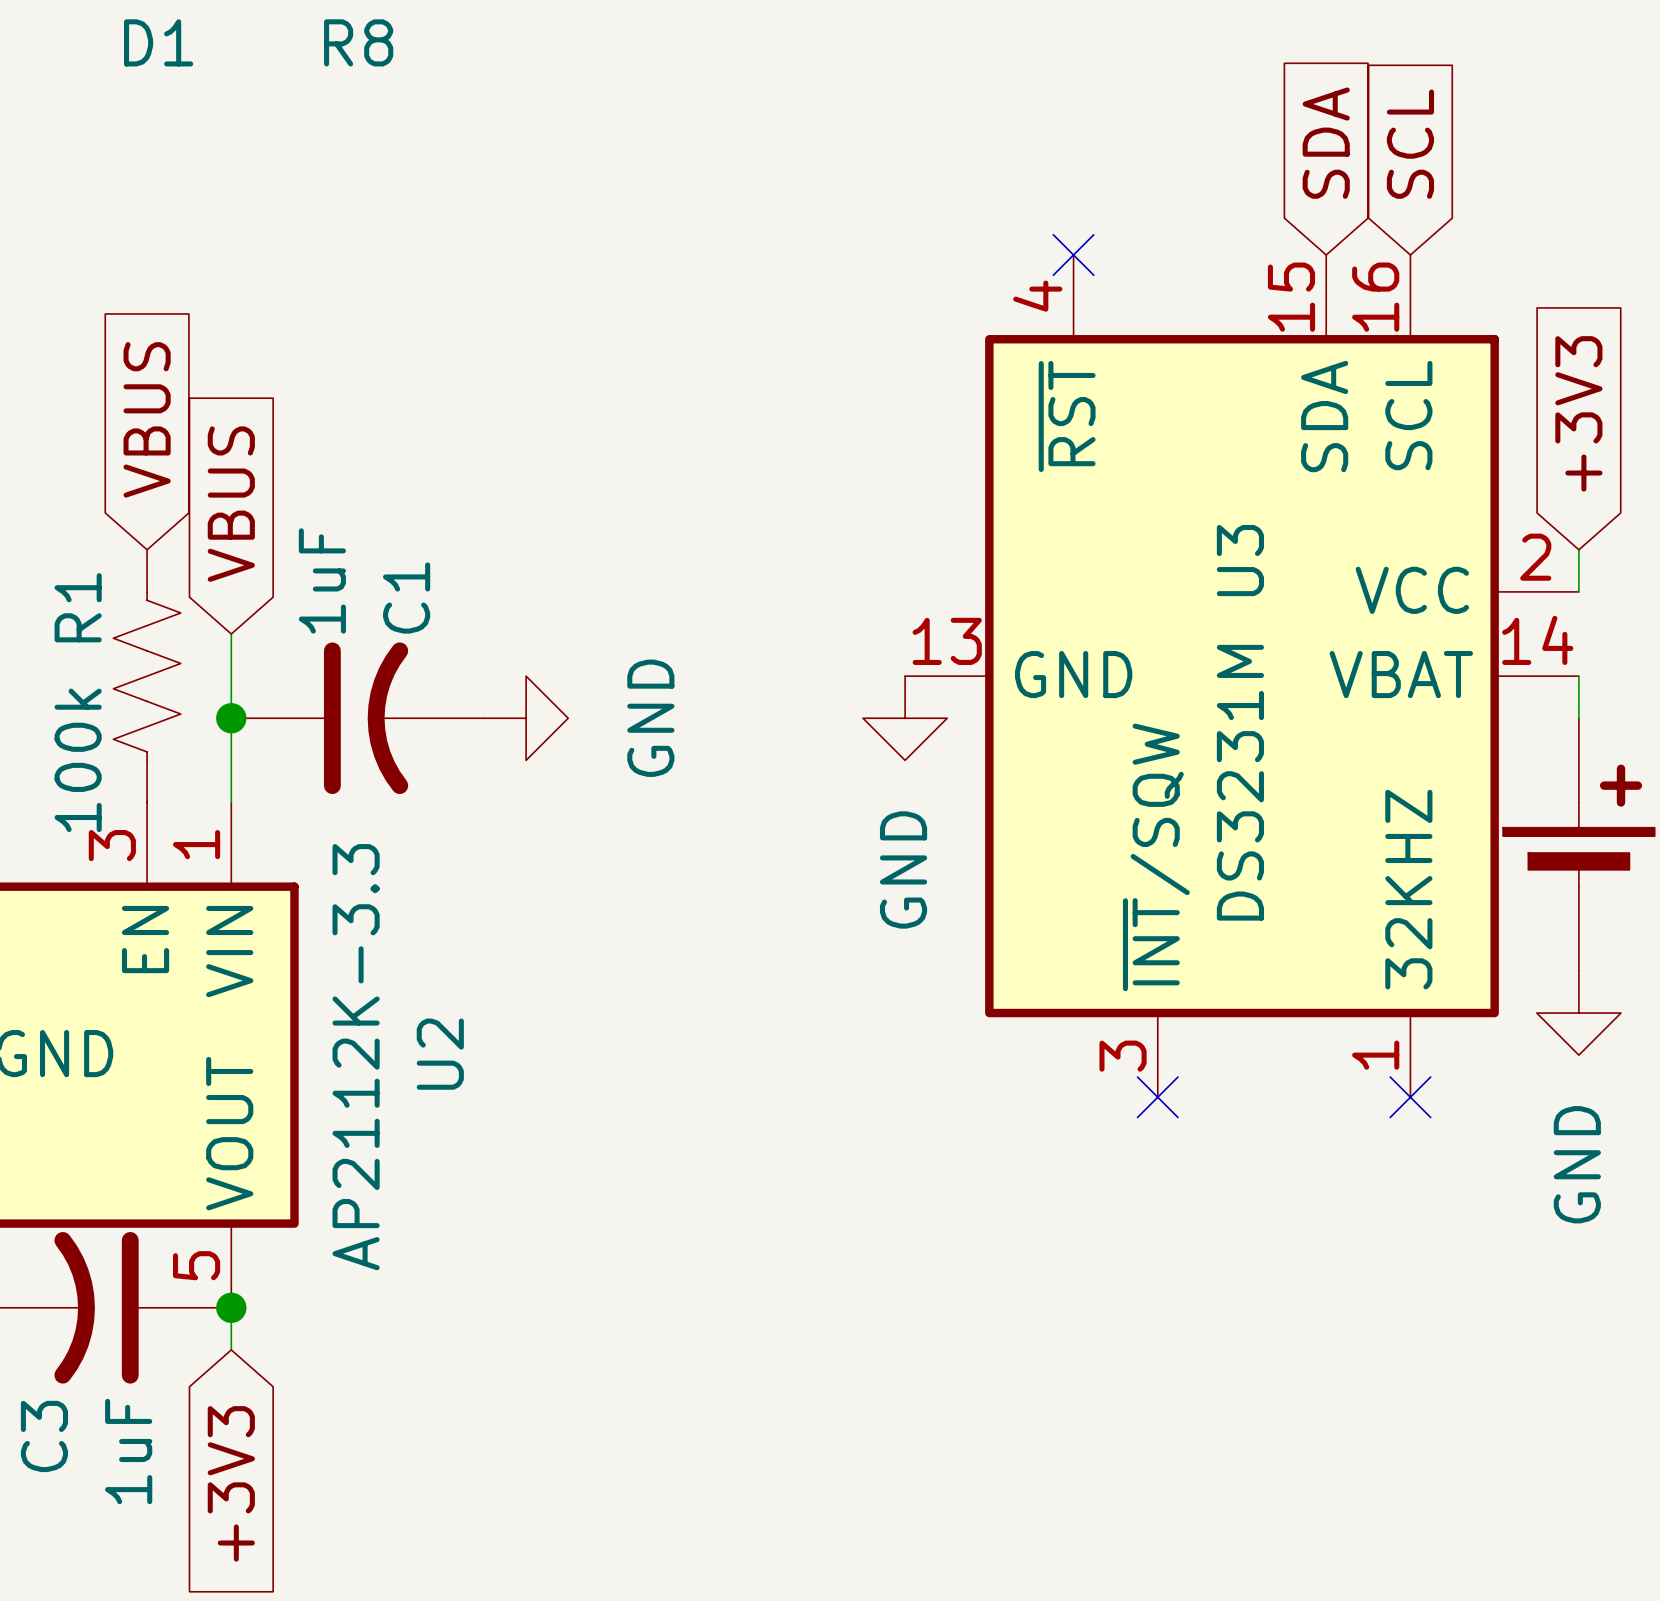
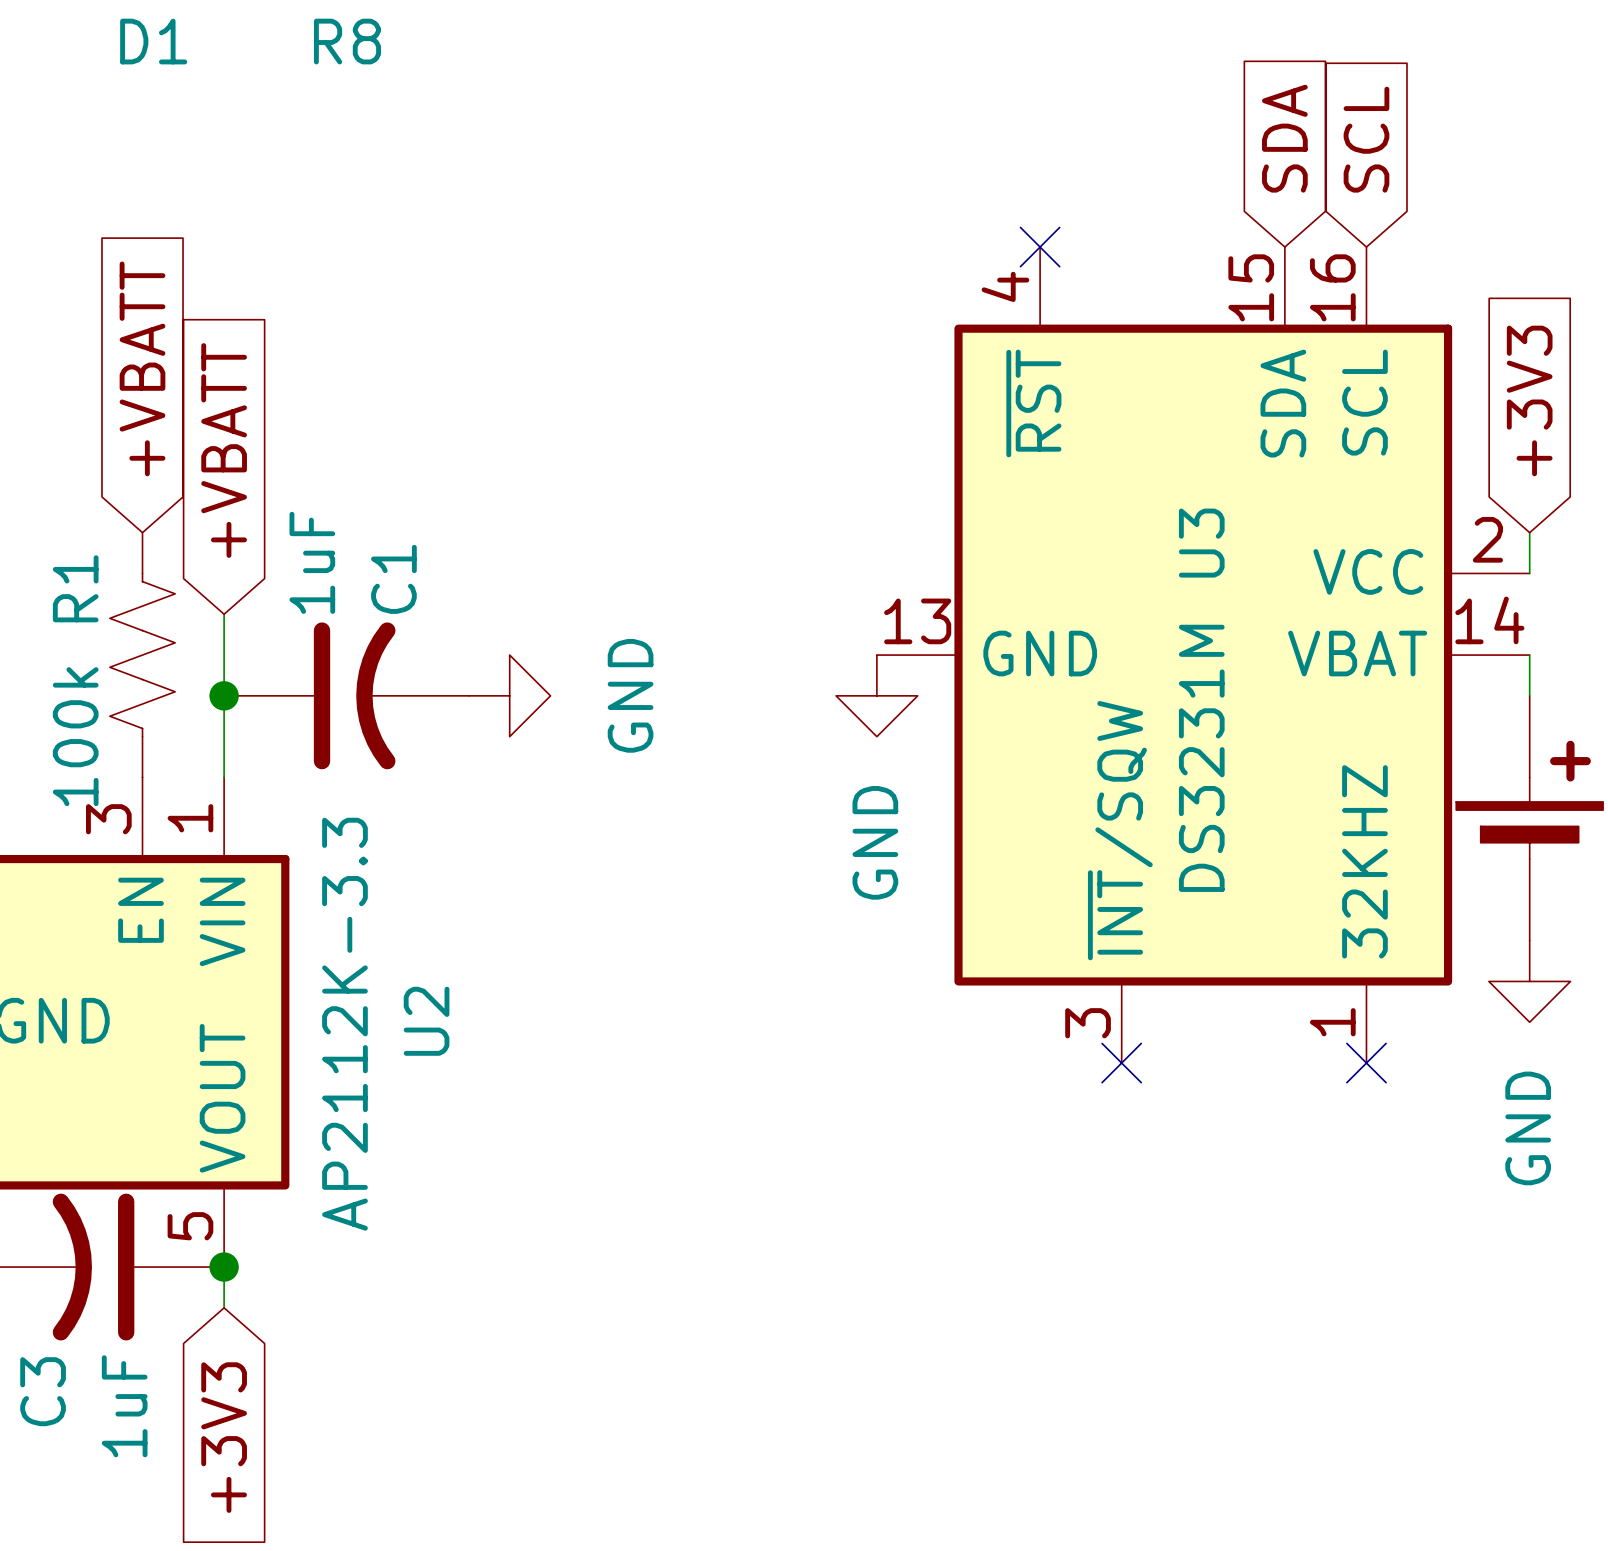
global label: VBUS (147, 419) -> +VBATT (142, 368)
global label: VBUS (231, 504) -> +VBATT (224, 450)

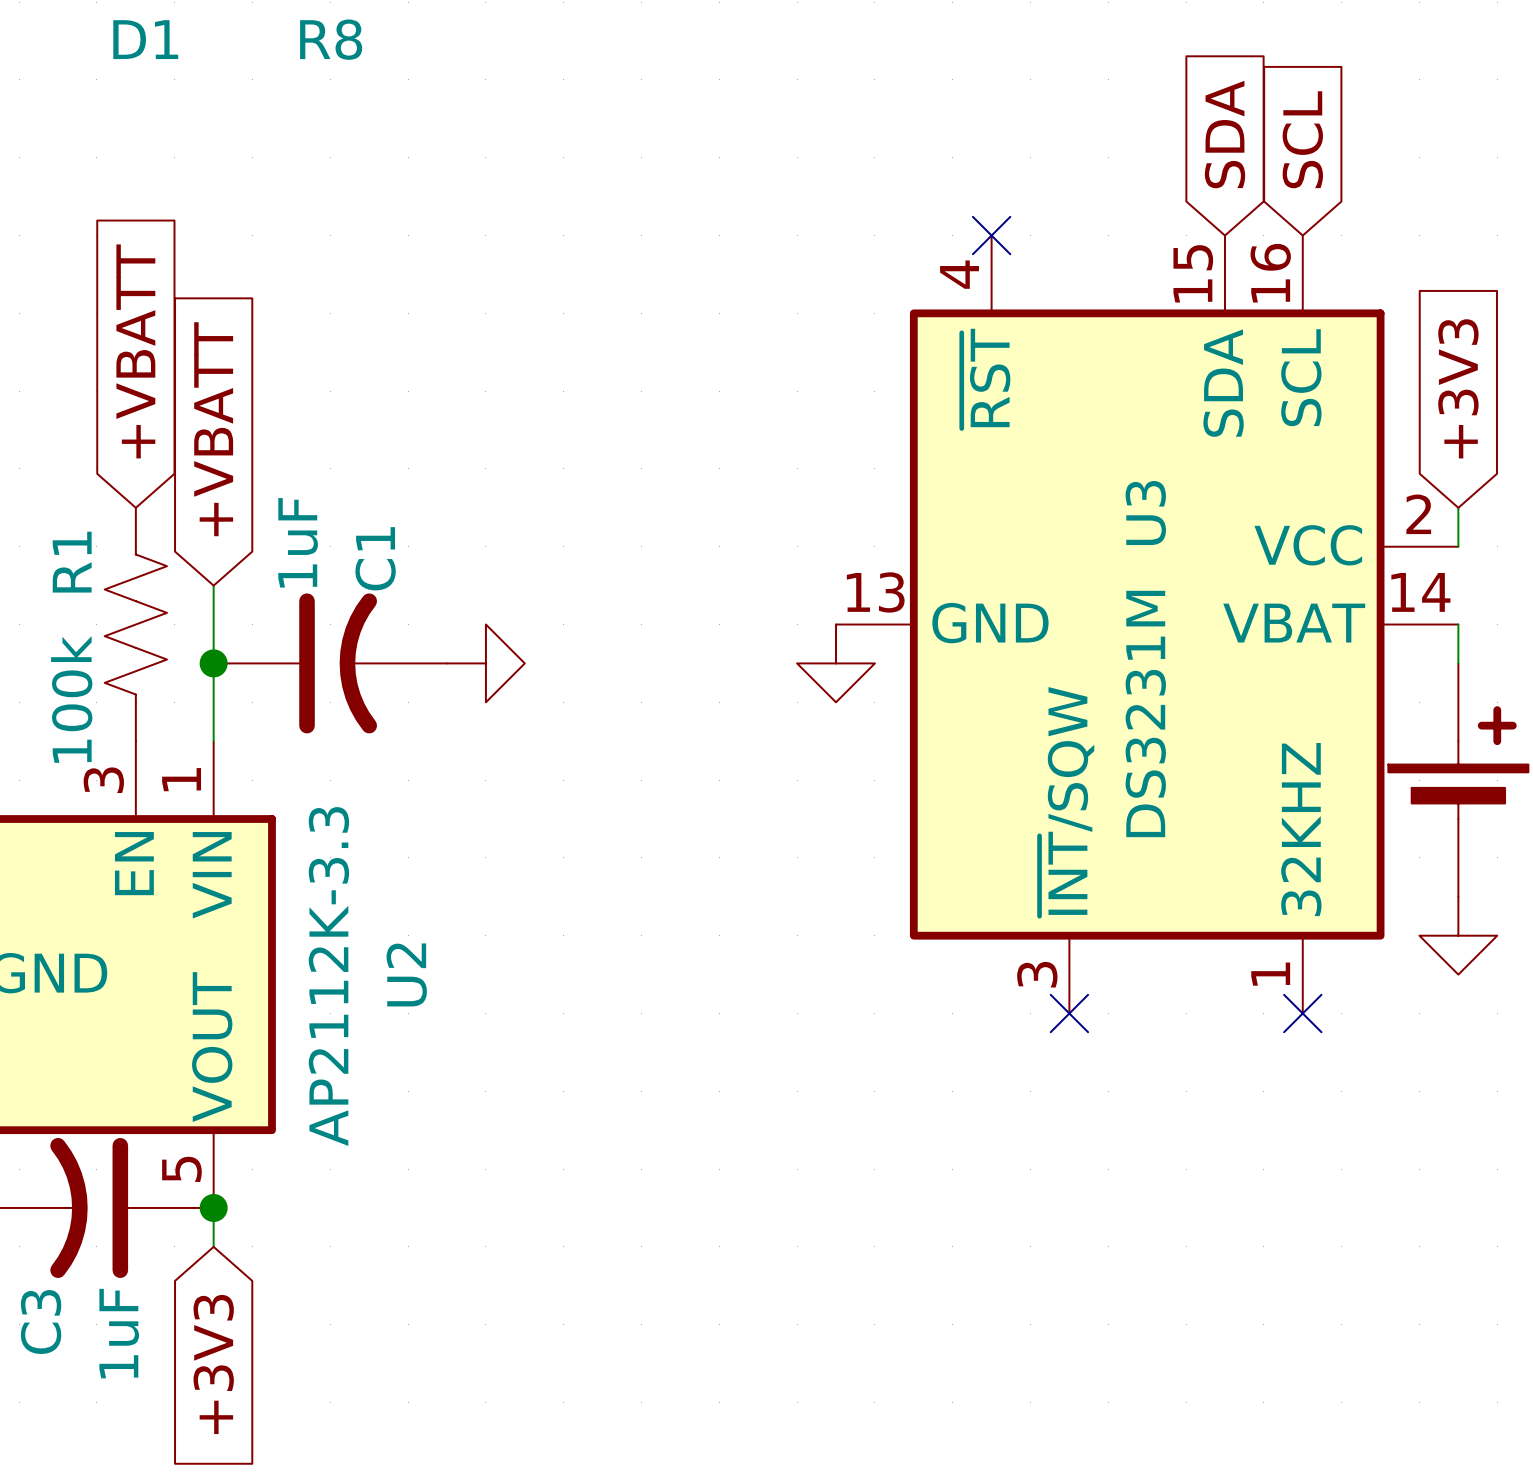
power symbol text: GND (630, 695) -> none
power symbol text: GND (875, 842) -> none
power symbol text: GND (1528, 1128) -> none

